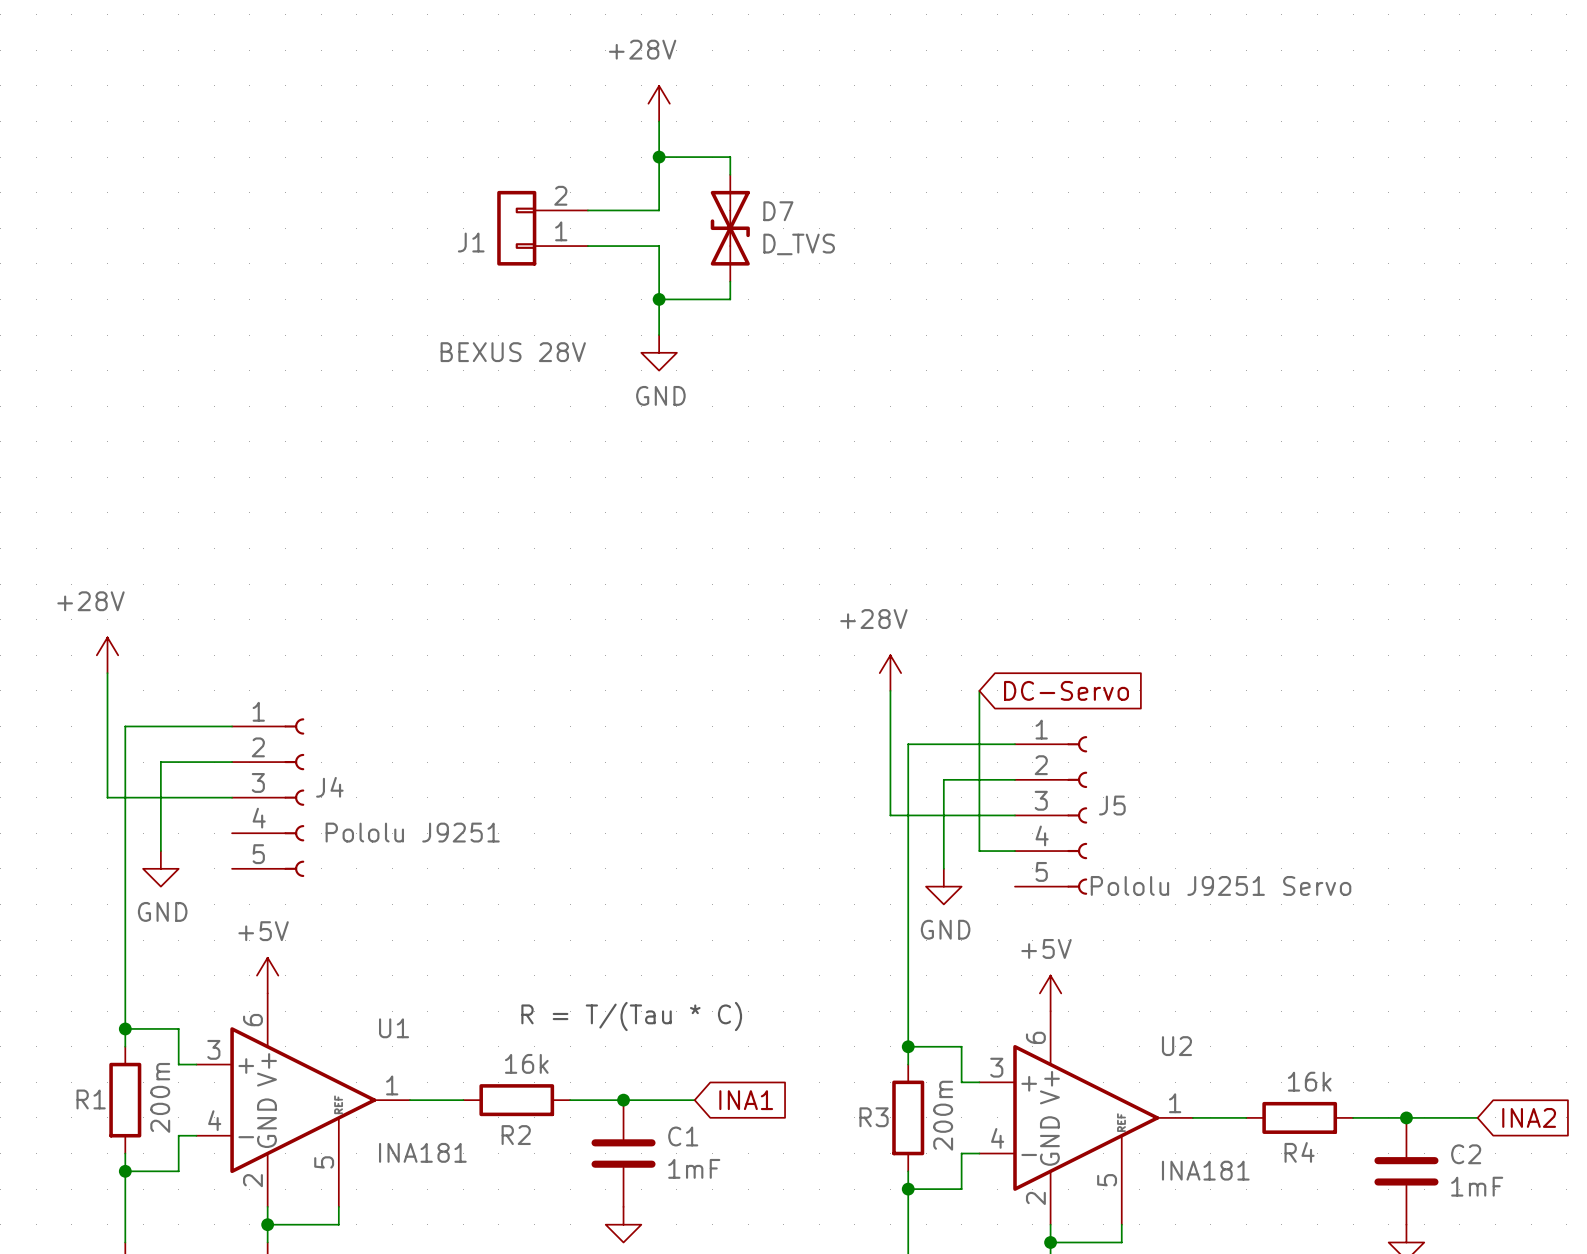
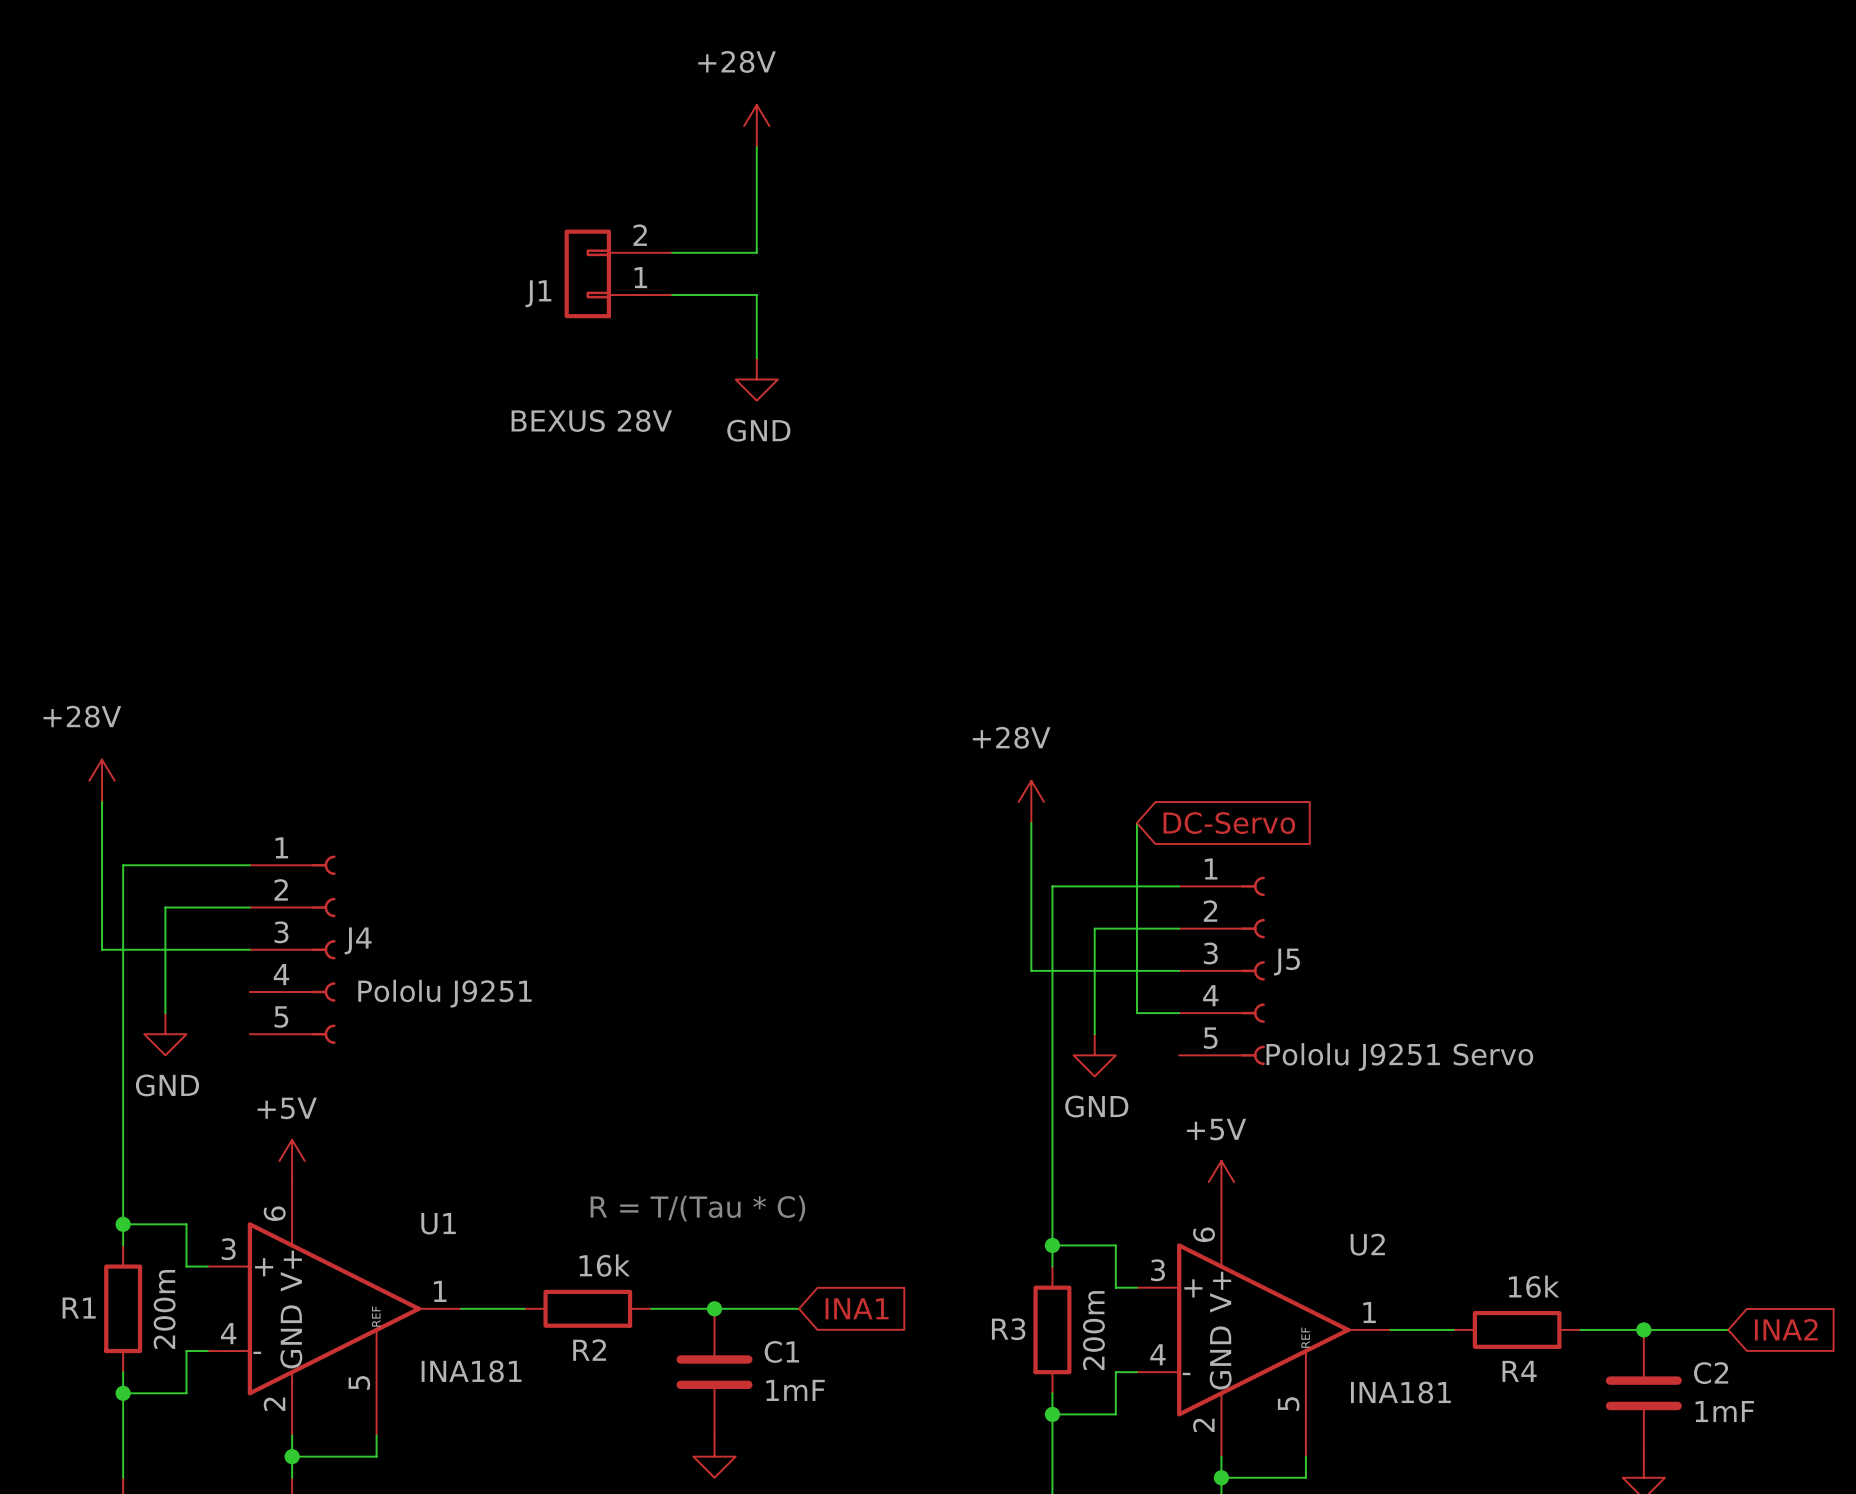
wire: (659, 157) (730, 157) (730, 174) -> none
junction: (659, 157) -> none
D7: D_TVS (730, 228) -> none
wire: (730, 281) (730, 299) (659, 299) (659, 335) -> none
junction: (659, 299) -> none
power symbol position: GND (659, 352) -> GND (756, 379)

